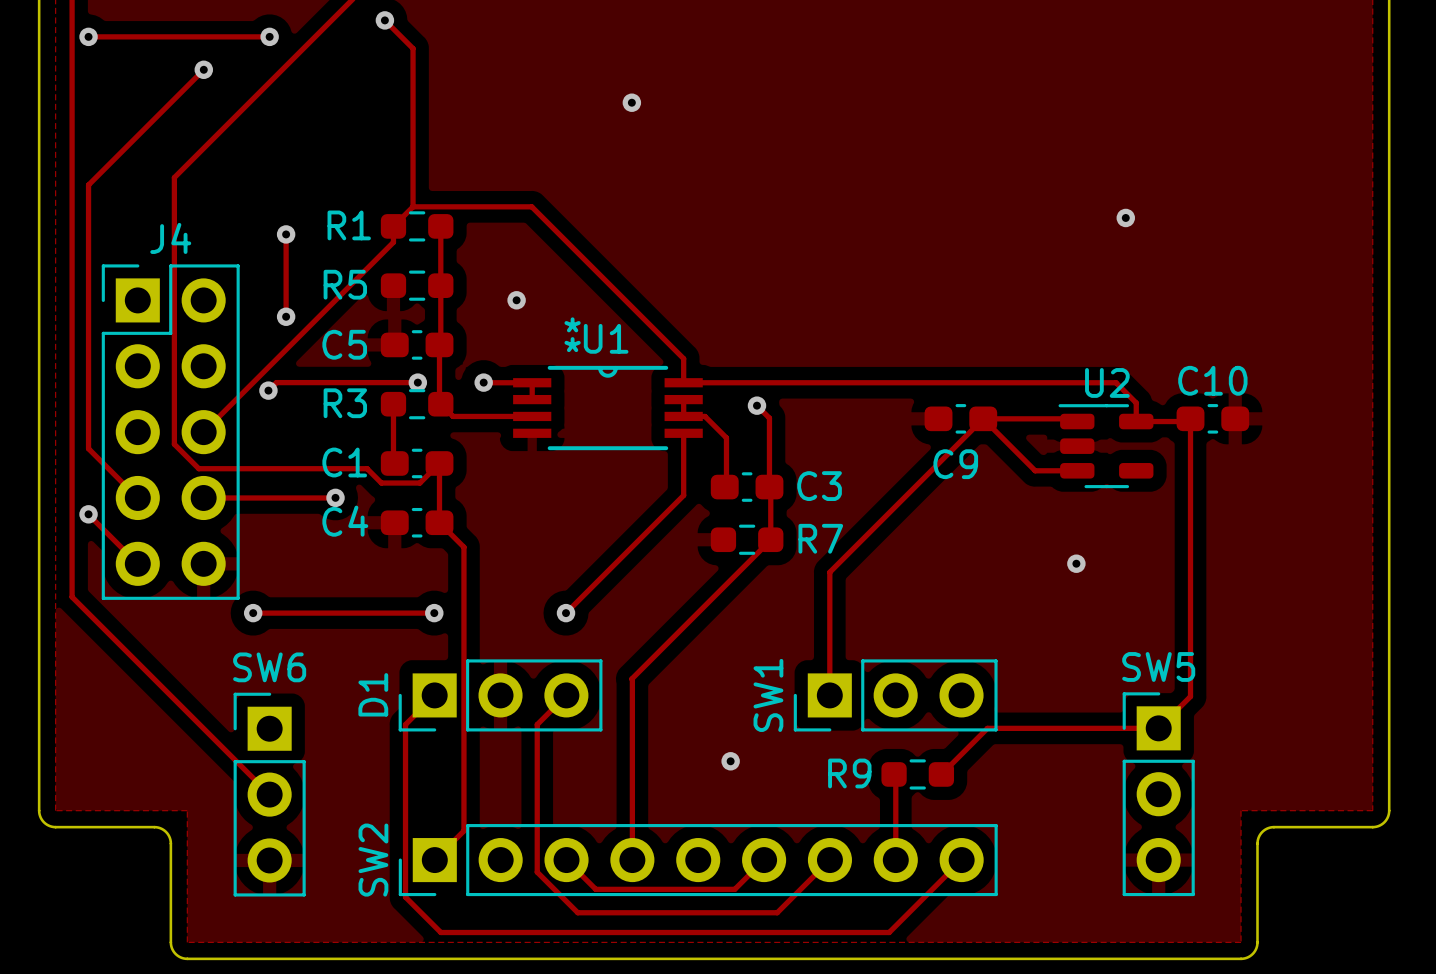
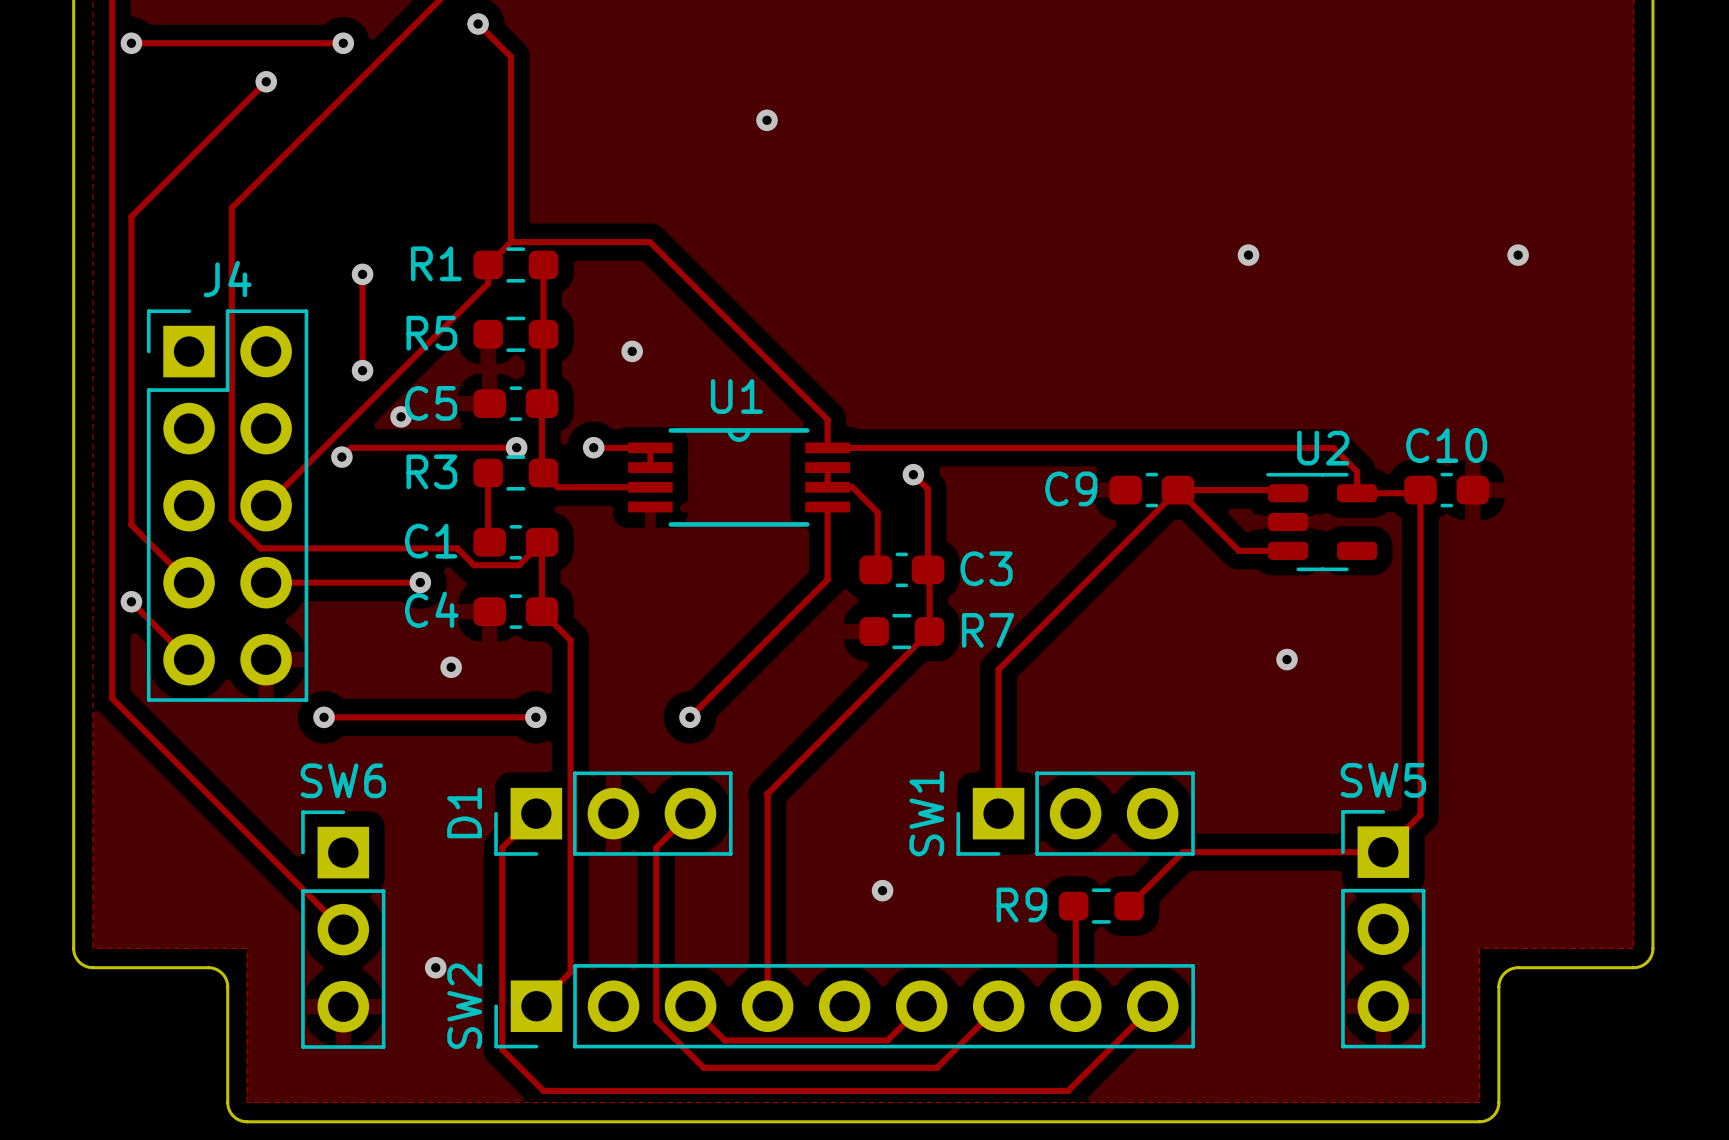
via: none -> (1248, 255)
via: (1125, 217) -> none
via: none -> (1518, 255)
U1 text: * (572, 324) -> none
U1 text: * (572, 344) -> none
via: none -> (401, 416)
C9 name position: C9 (955, 464) -> C9 (1071, 488)
via: none -> (451, 667)
via: none -> (435, 967)

